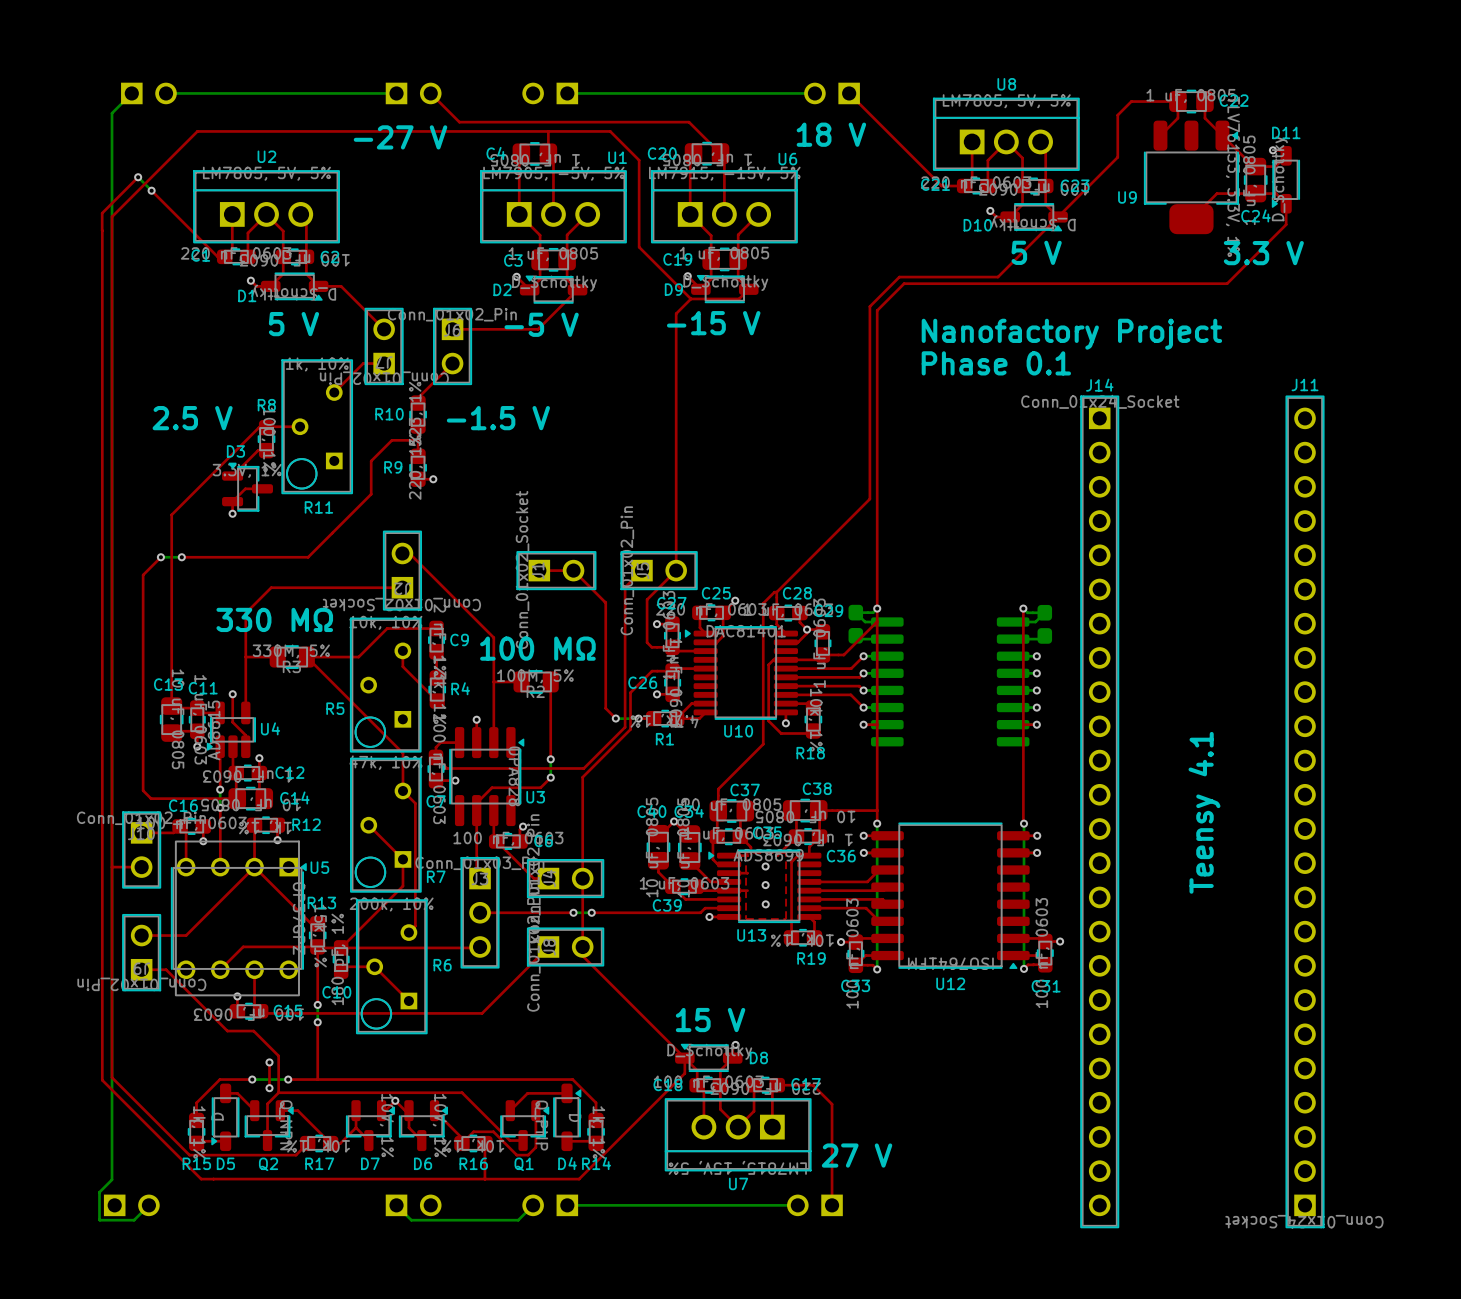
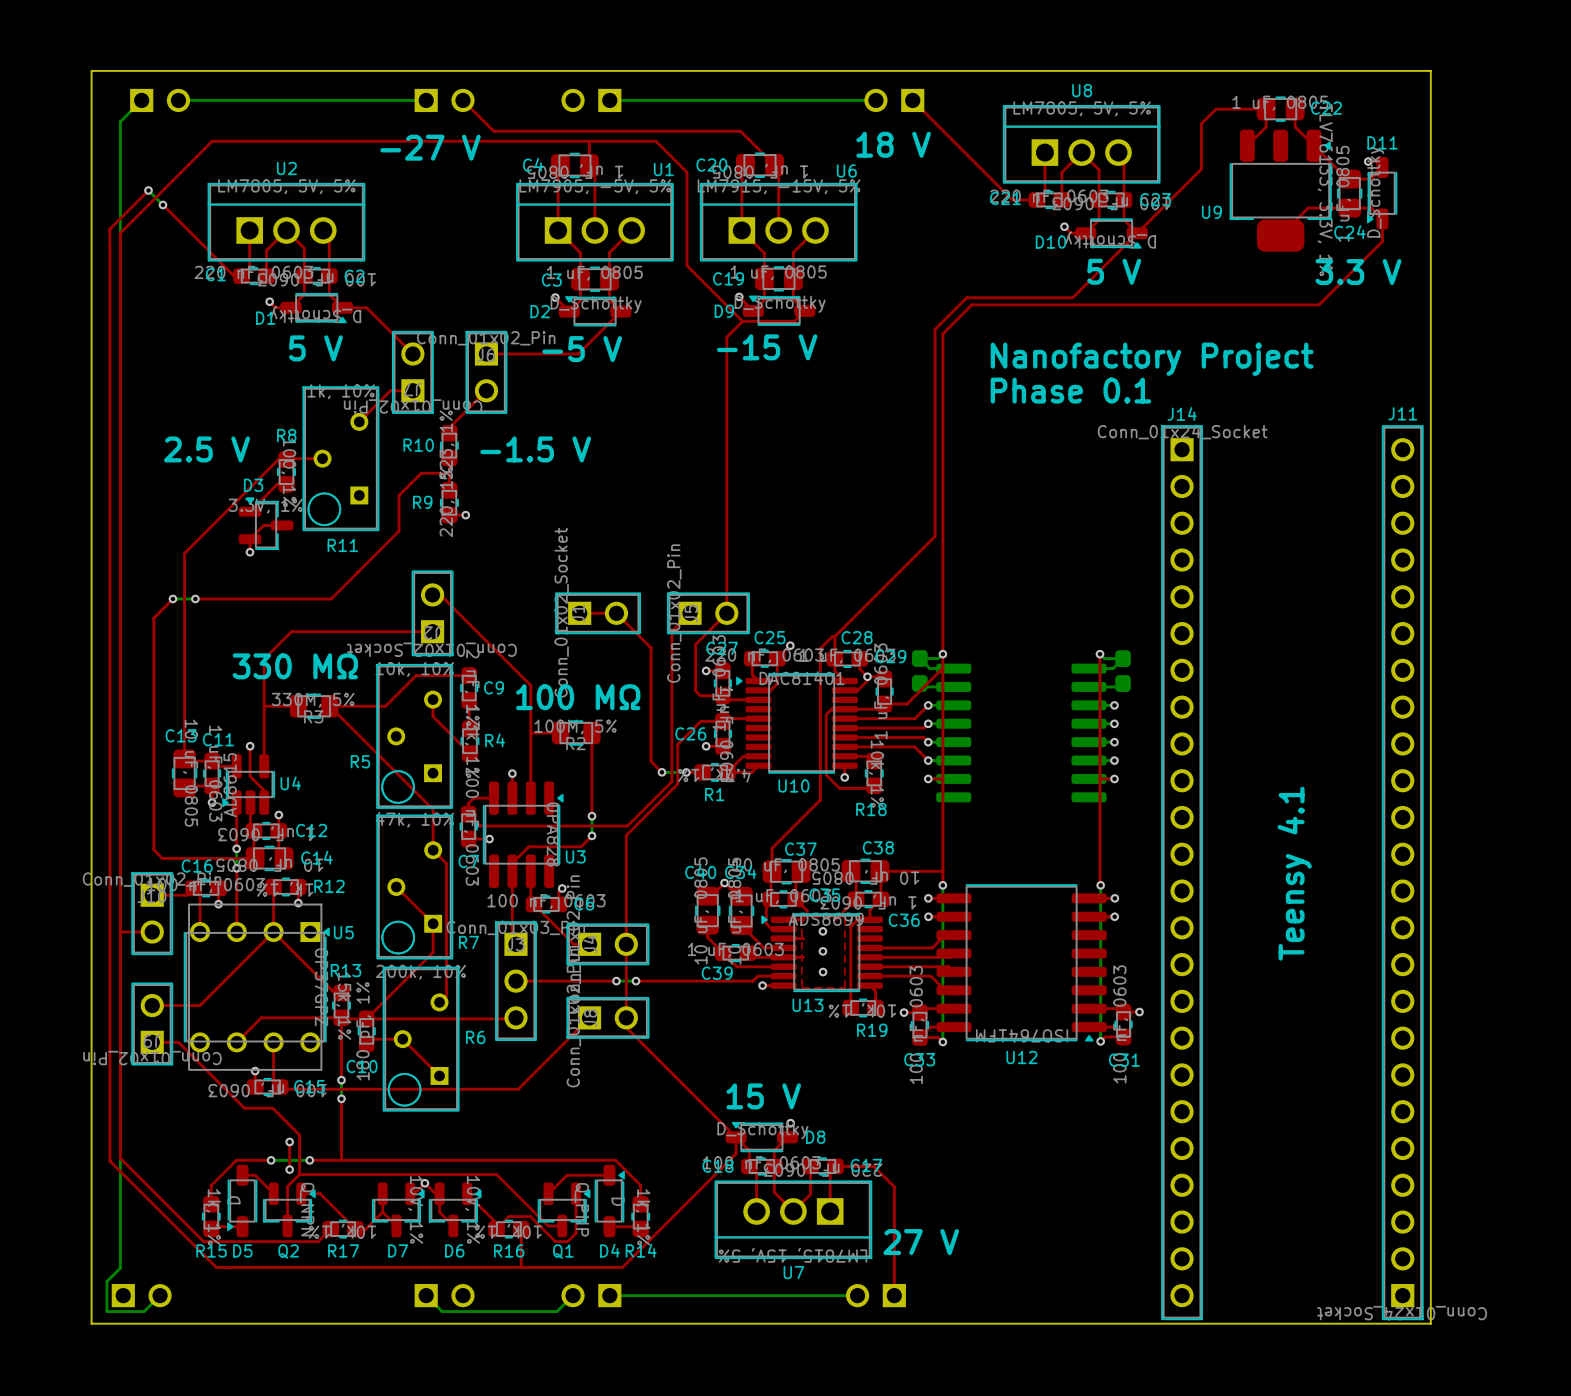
board edge: none -> (91, 70) (1430, 70) (1430, 1323) (91, 1323) (91, 70)

